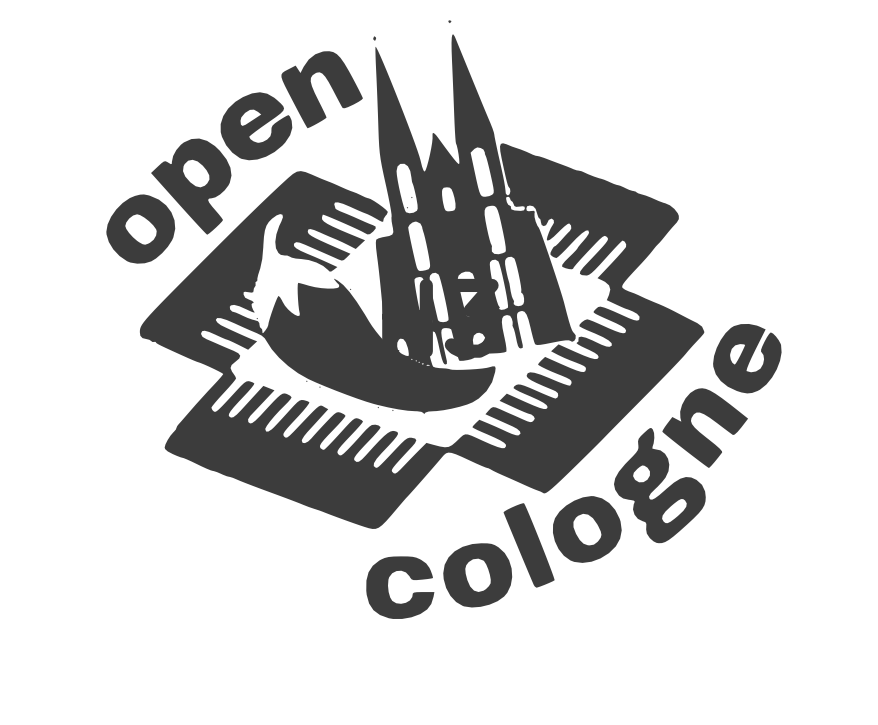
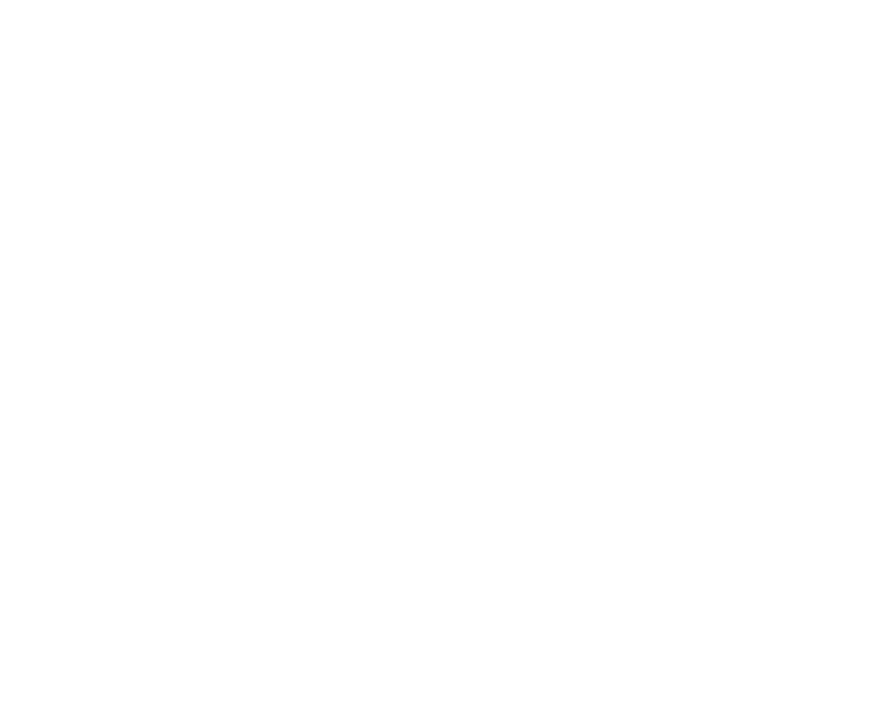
part: (443, 319) -> none

